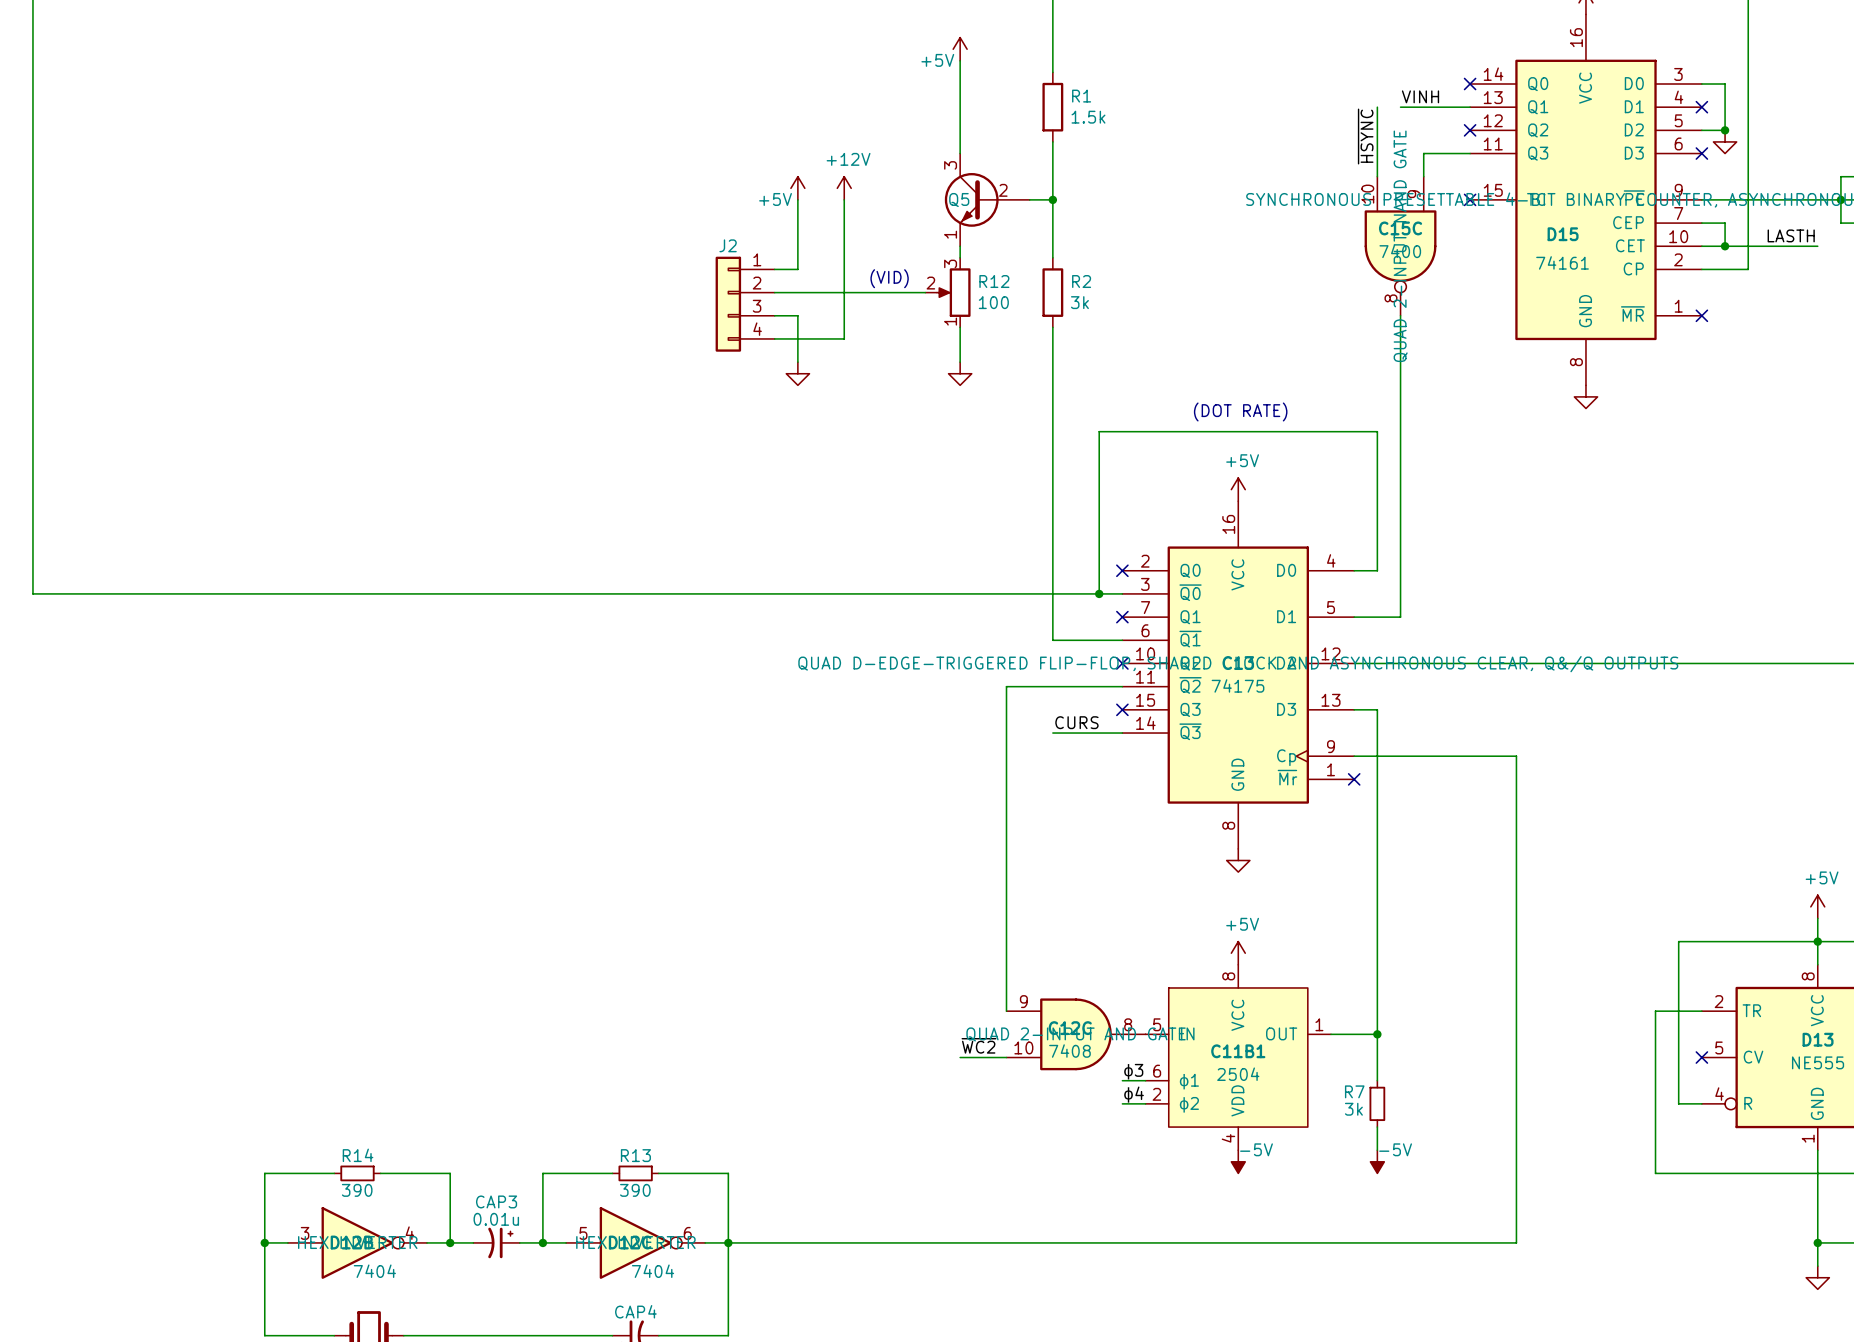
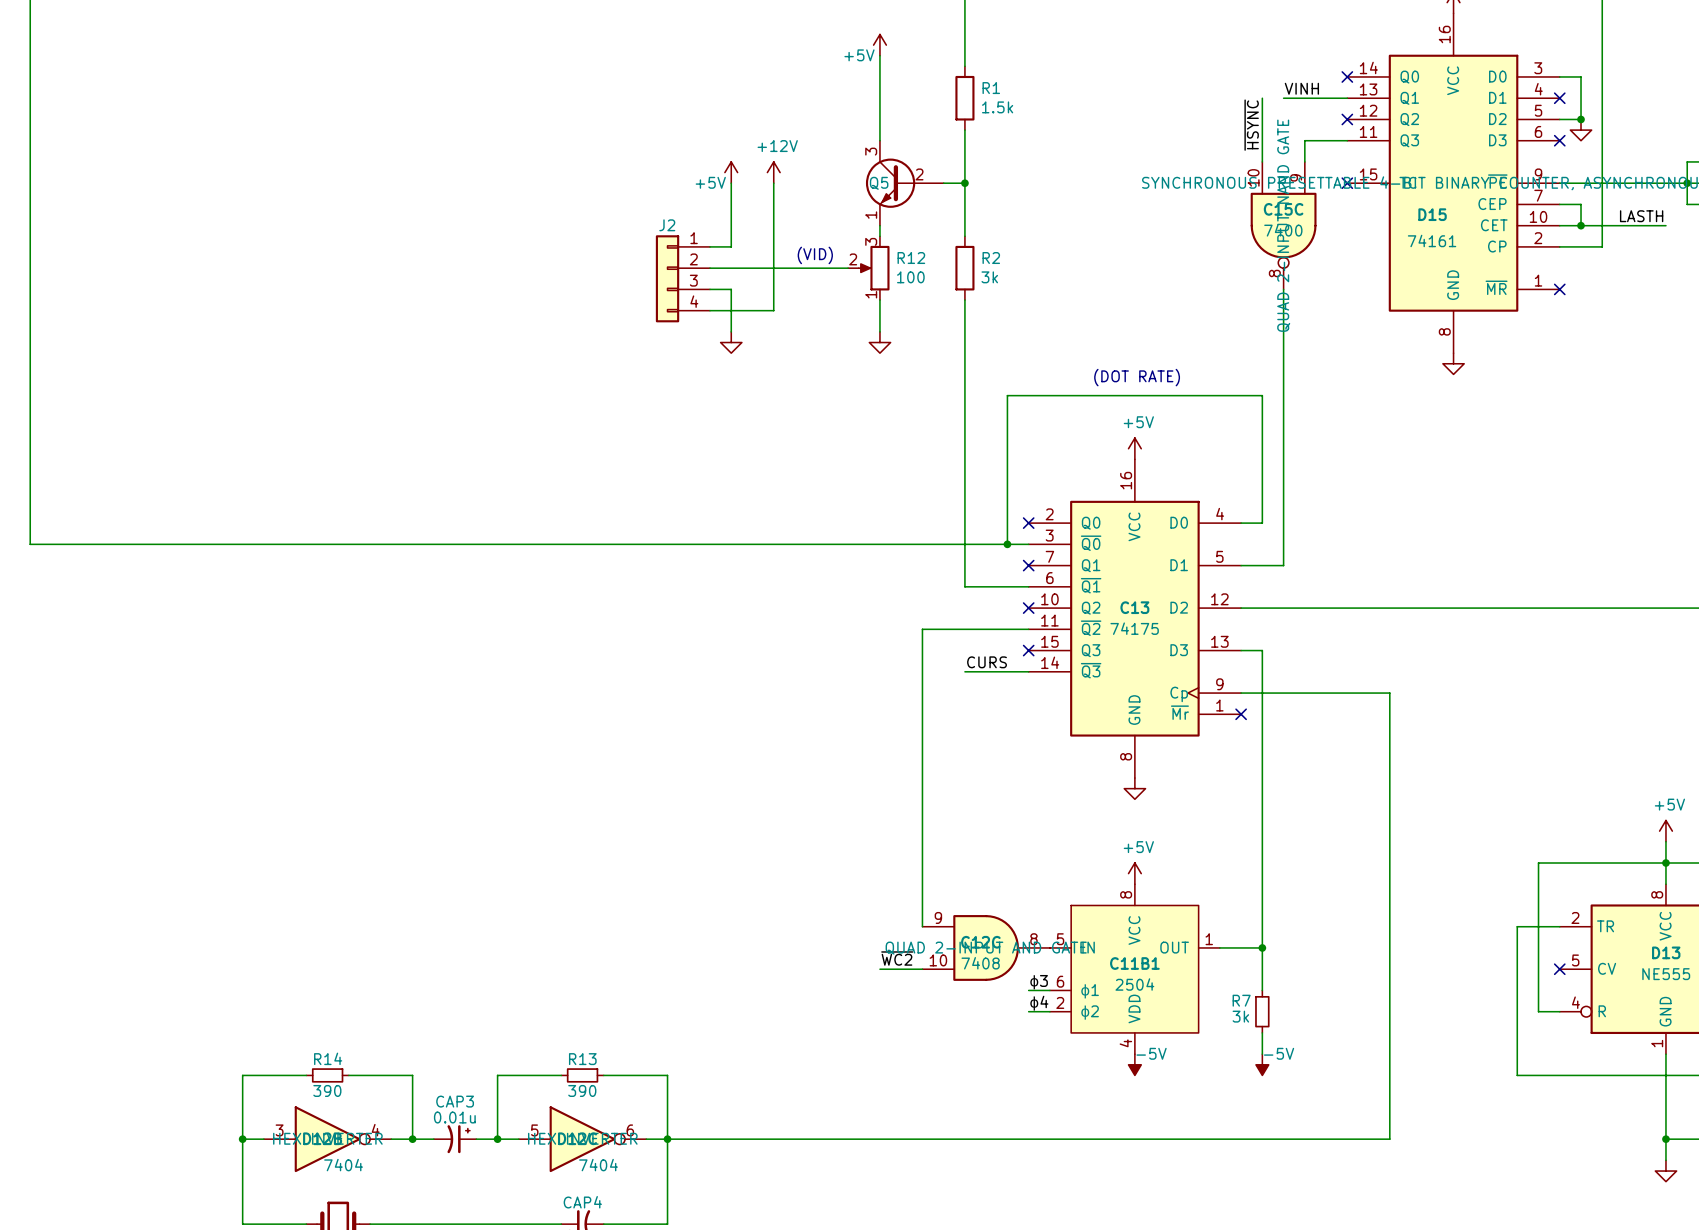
C13 text: QUAD D-EDGE-TRIGGERED FLIP-FLOP, SHARED CLOCK AND ASYNCHRONOUS CLEAR, Q&/Q OUTPUTS (1238, 664) -> none

